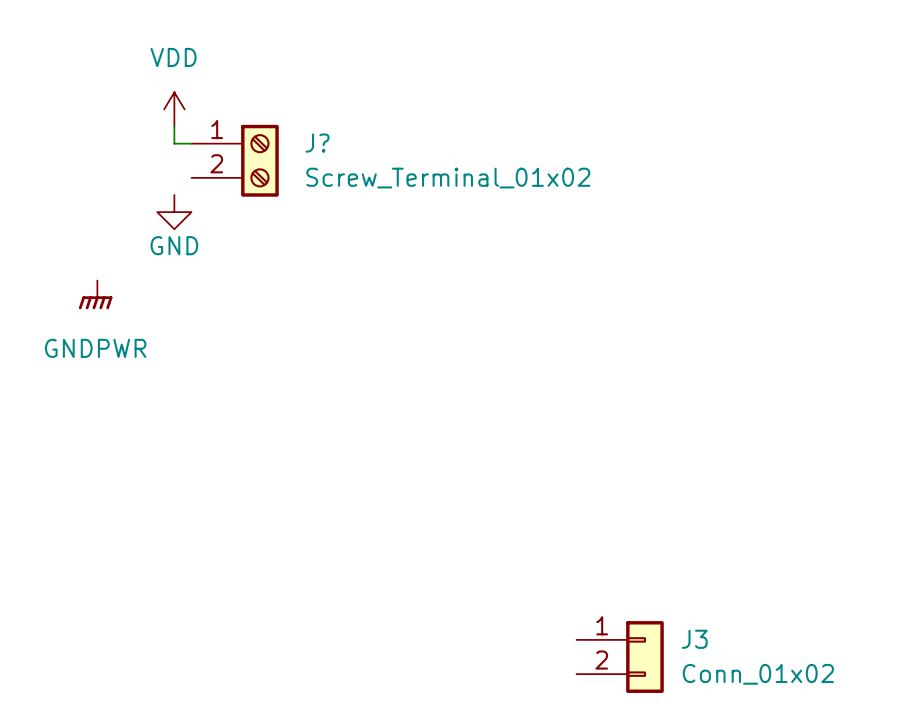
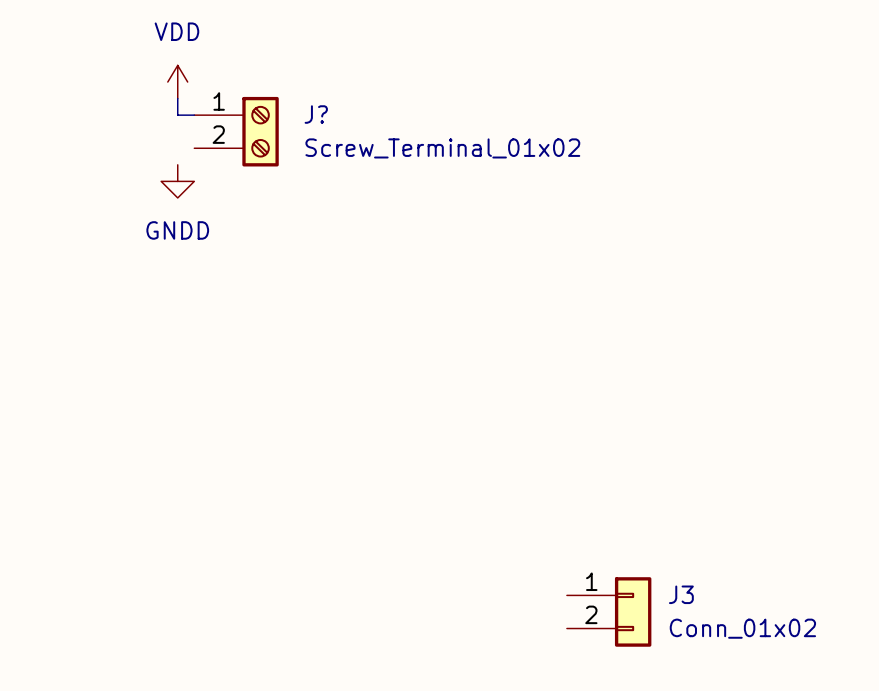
power symbol: GND (174, 212) -> GNDD (177, 181)
power symbol: GNDPWR (95, 294) -> none

